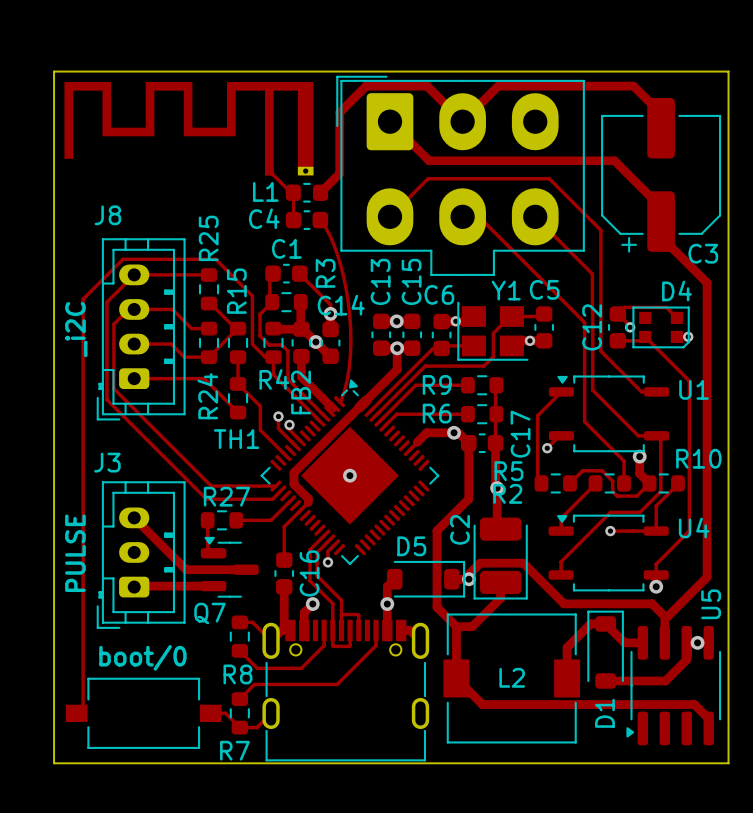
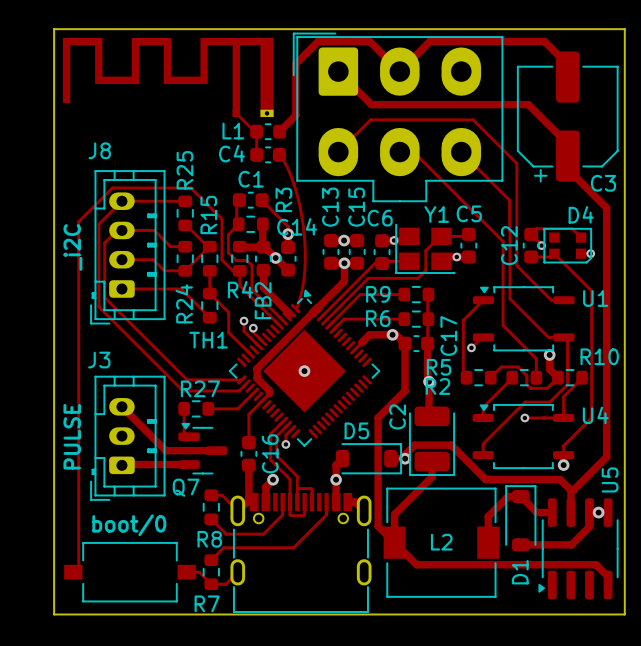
track: (500, 598) (472, 626) (456, 626) -> (432, 474) (432, 477) (394, 514)
track: (436, 607) (456, 626) -> (378, 482) (378, 526) (394, 542)
track: (456, 626) (456, 645) -> none

